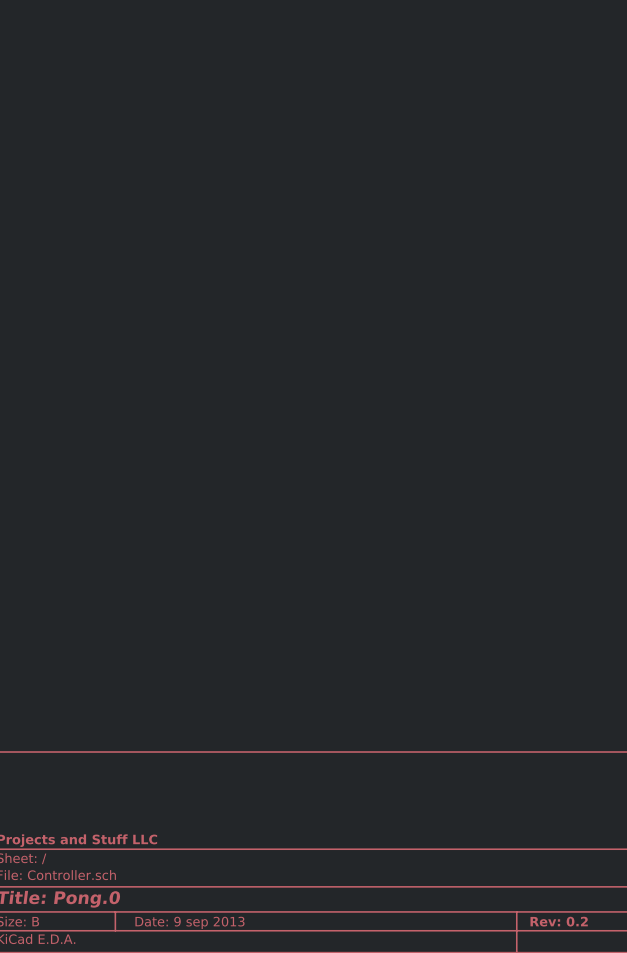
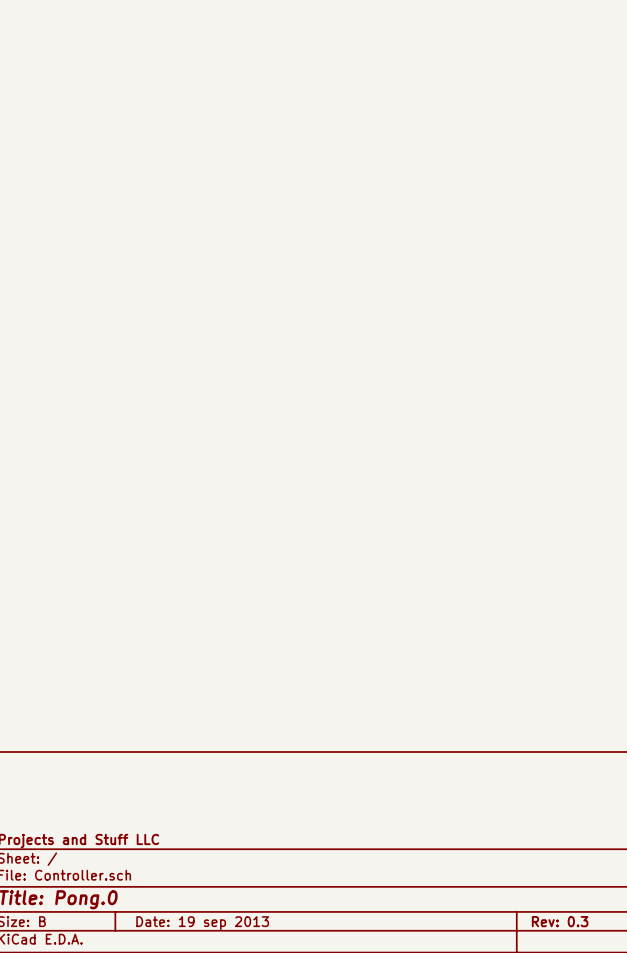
title block: Rev: 0.2 (559, 921) -> Rev: 0.3 (560, 921)
title block: Date: 9 sep 2013 (189, 922) -> Date: 19 sep 2013 (202, 923)

